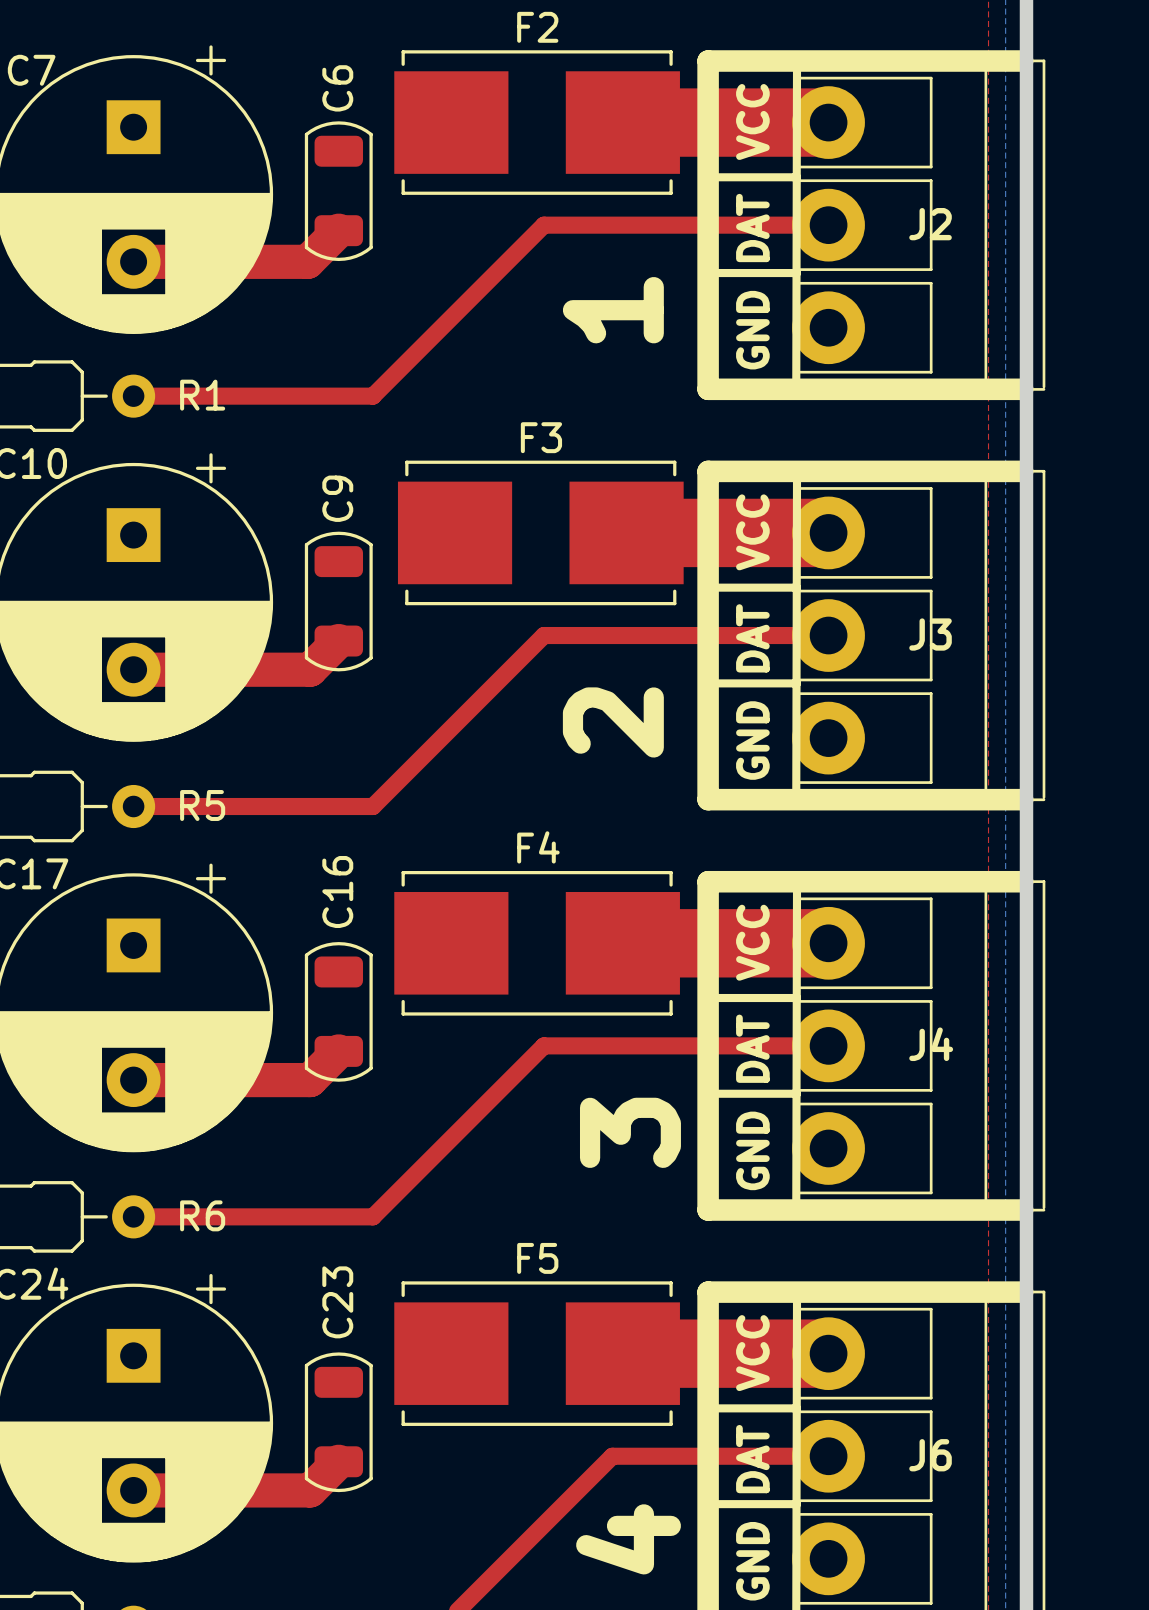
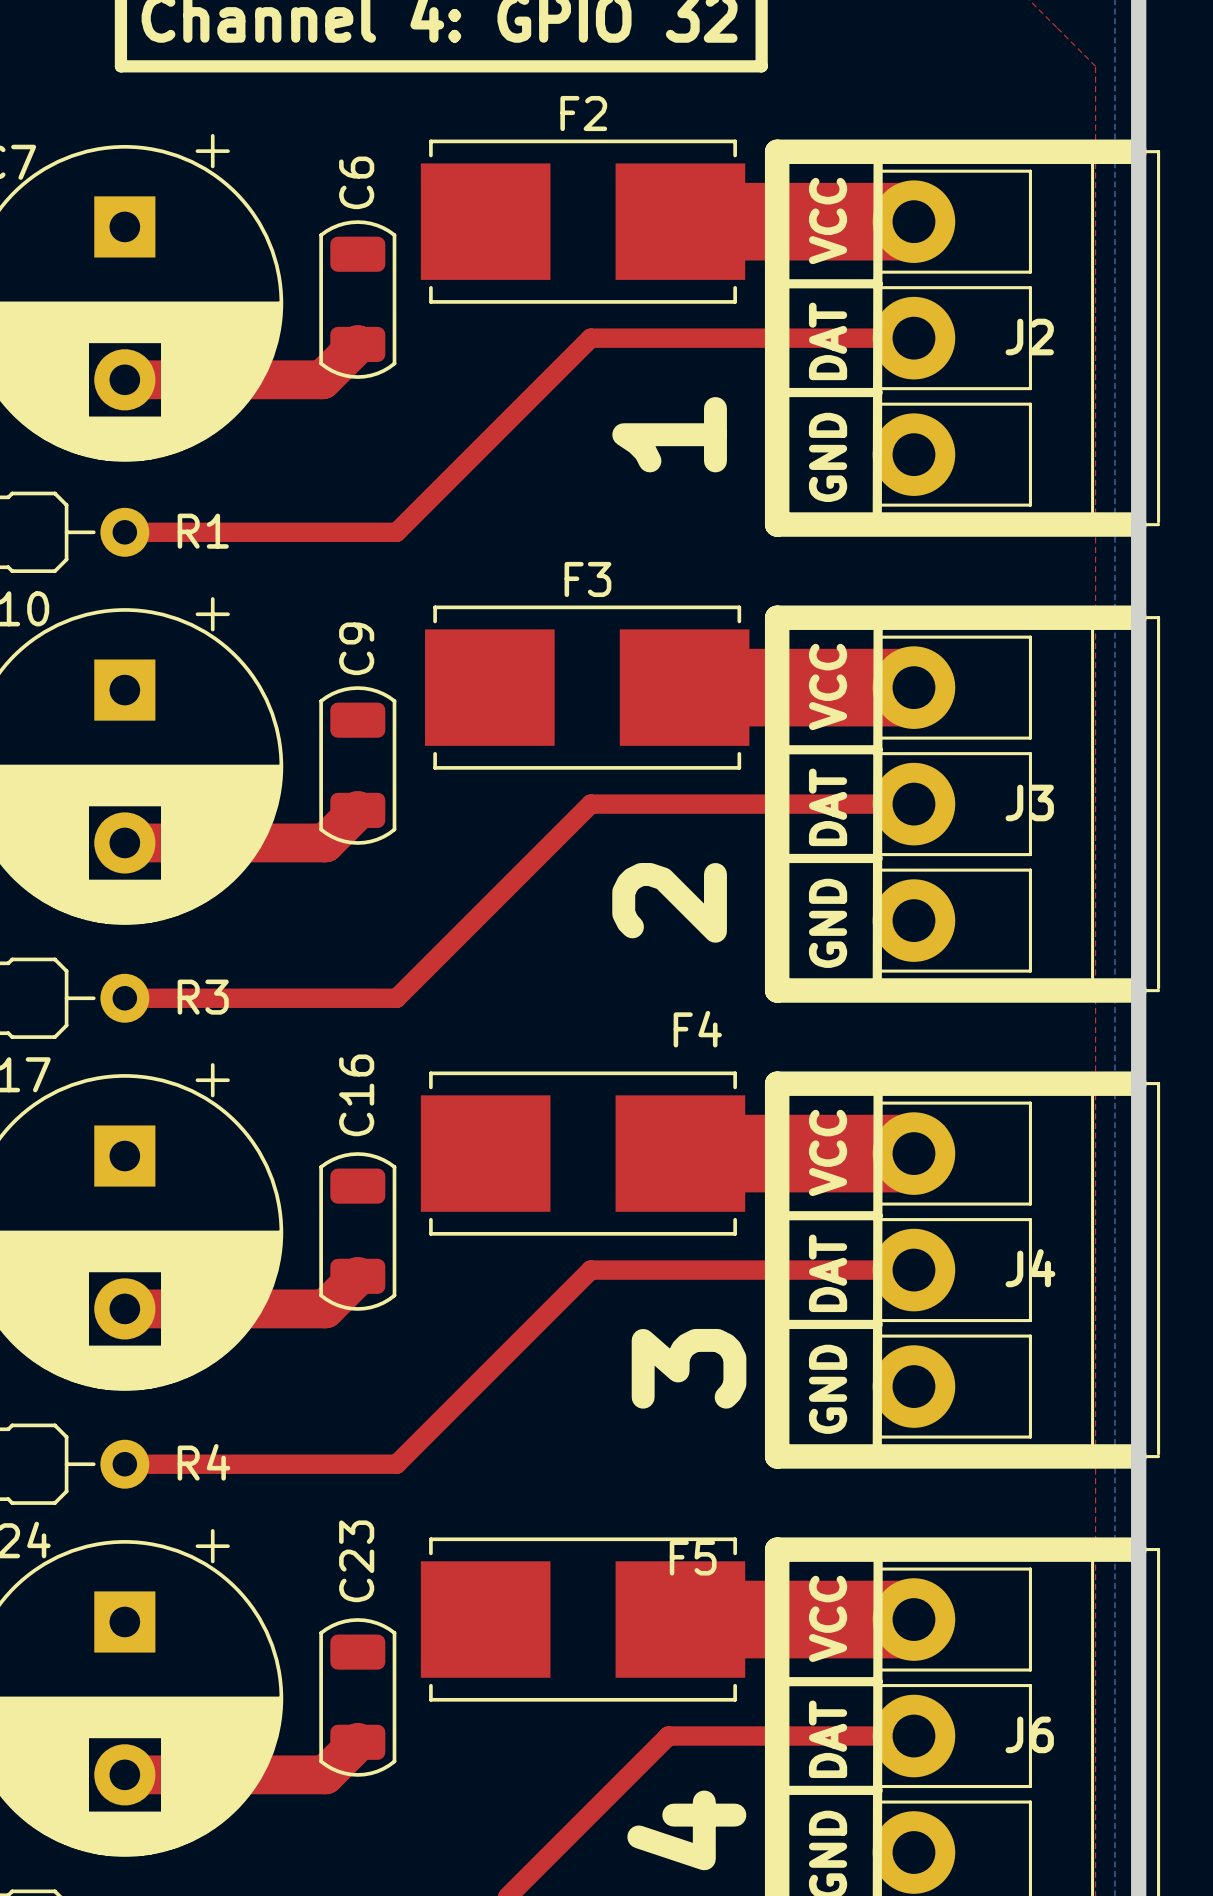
R5 name: R5 (202, 805) -> R3 (203, 997)
F4 name position: F4 (538, 847) -> F4 (697, 1029)
R6 name: R6 (202, 1215) -> R4 (203, 1462)
F5 name position: F5 (537, 1258) -> F5 (693, 1557)

